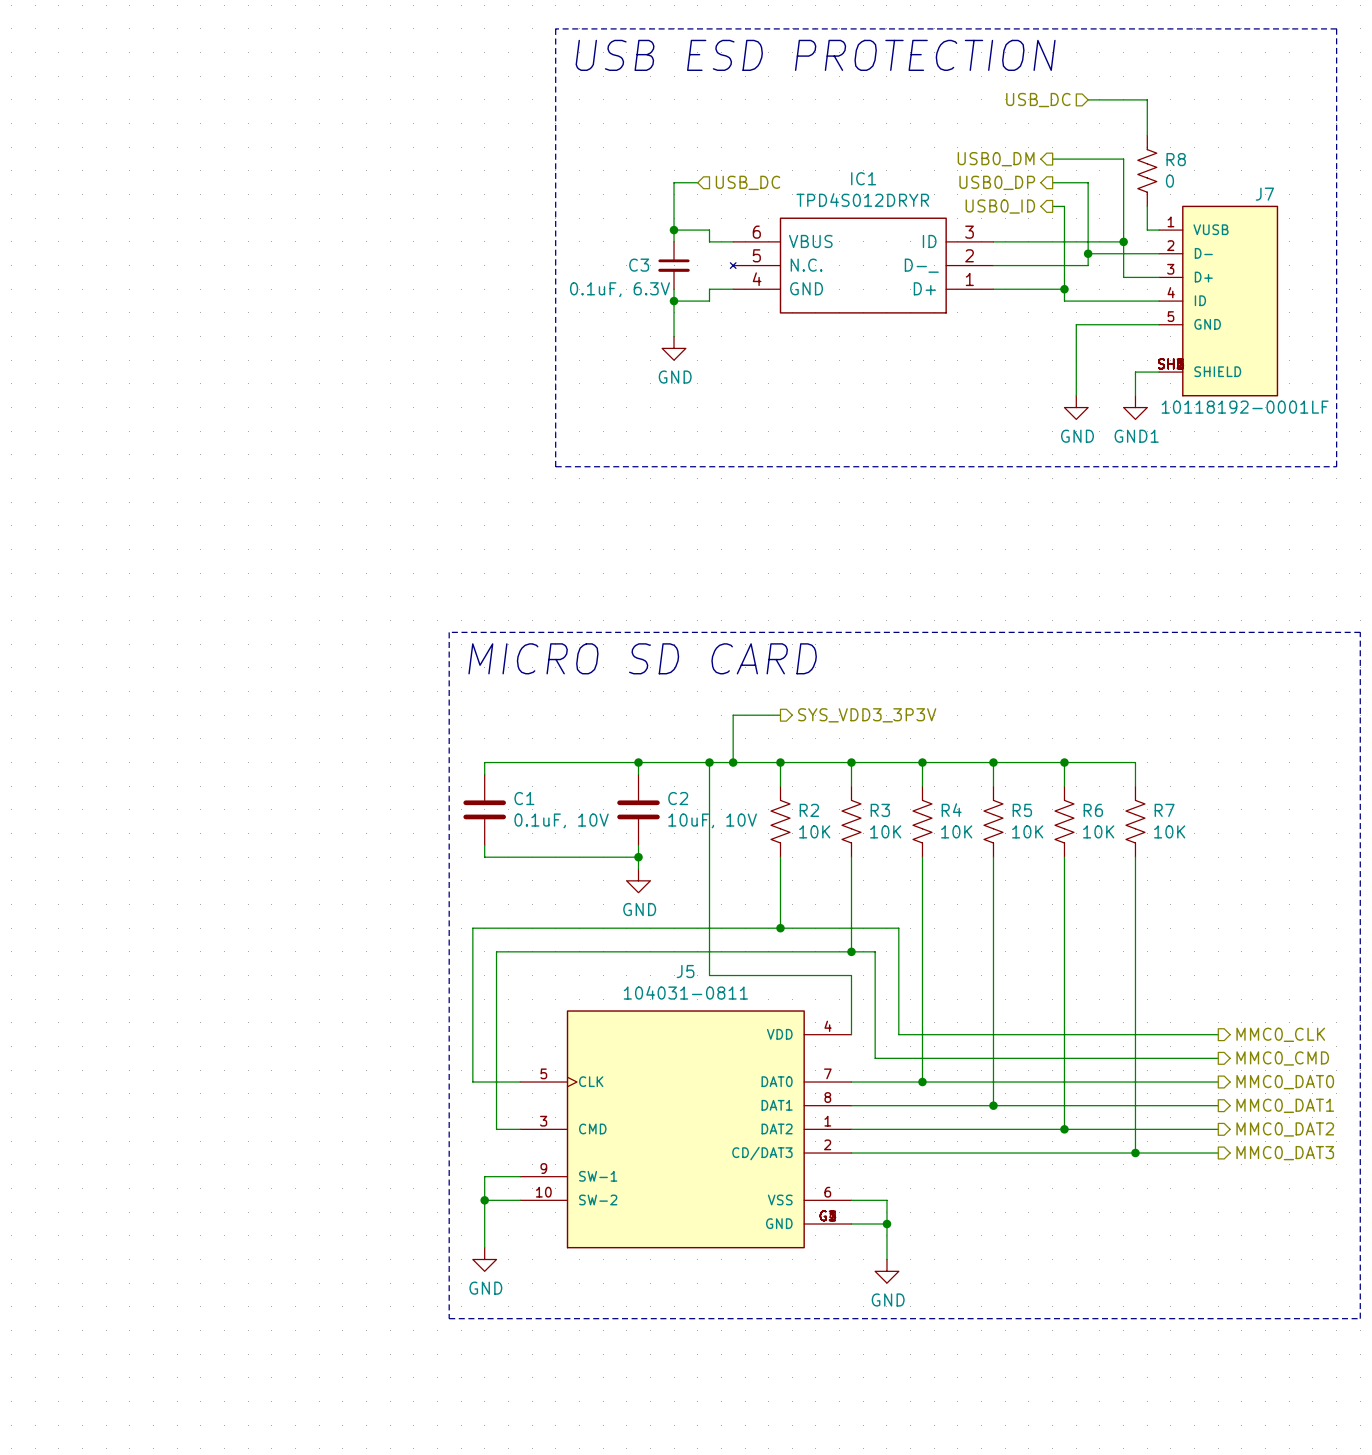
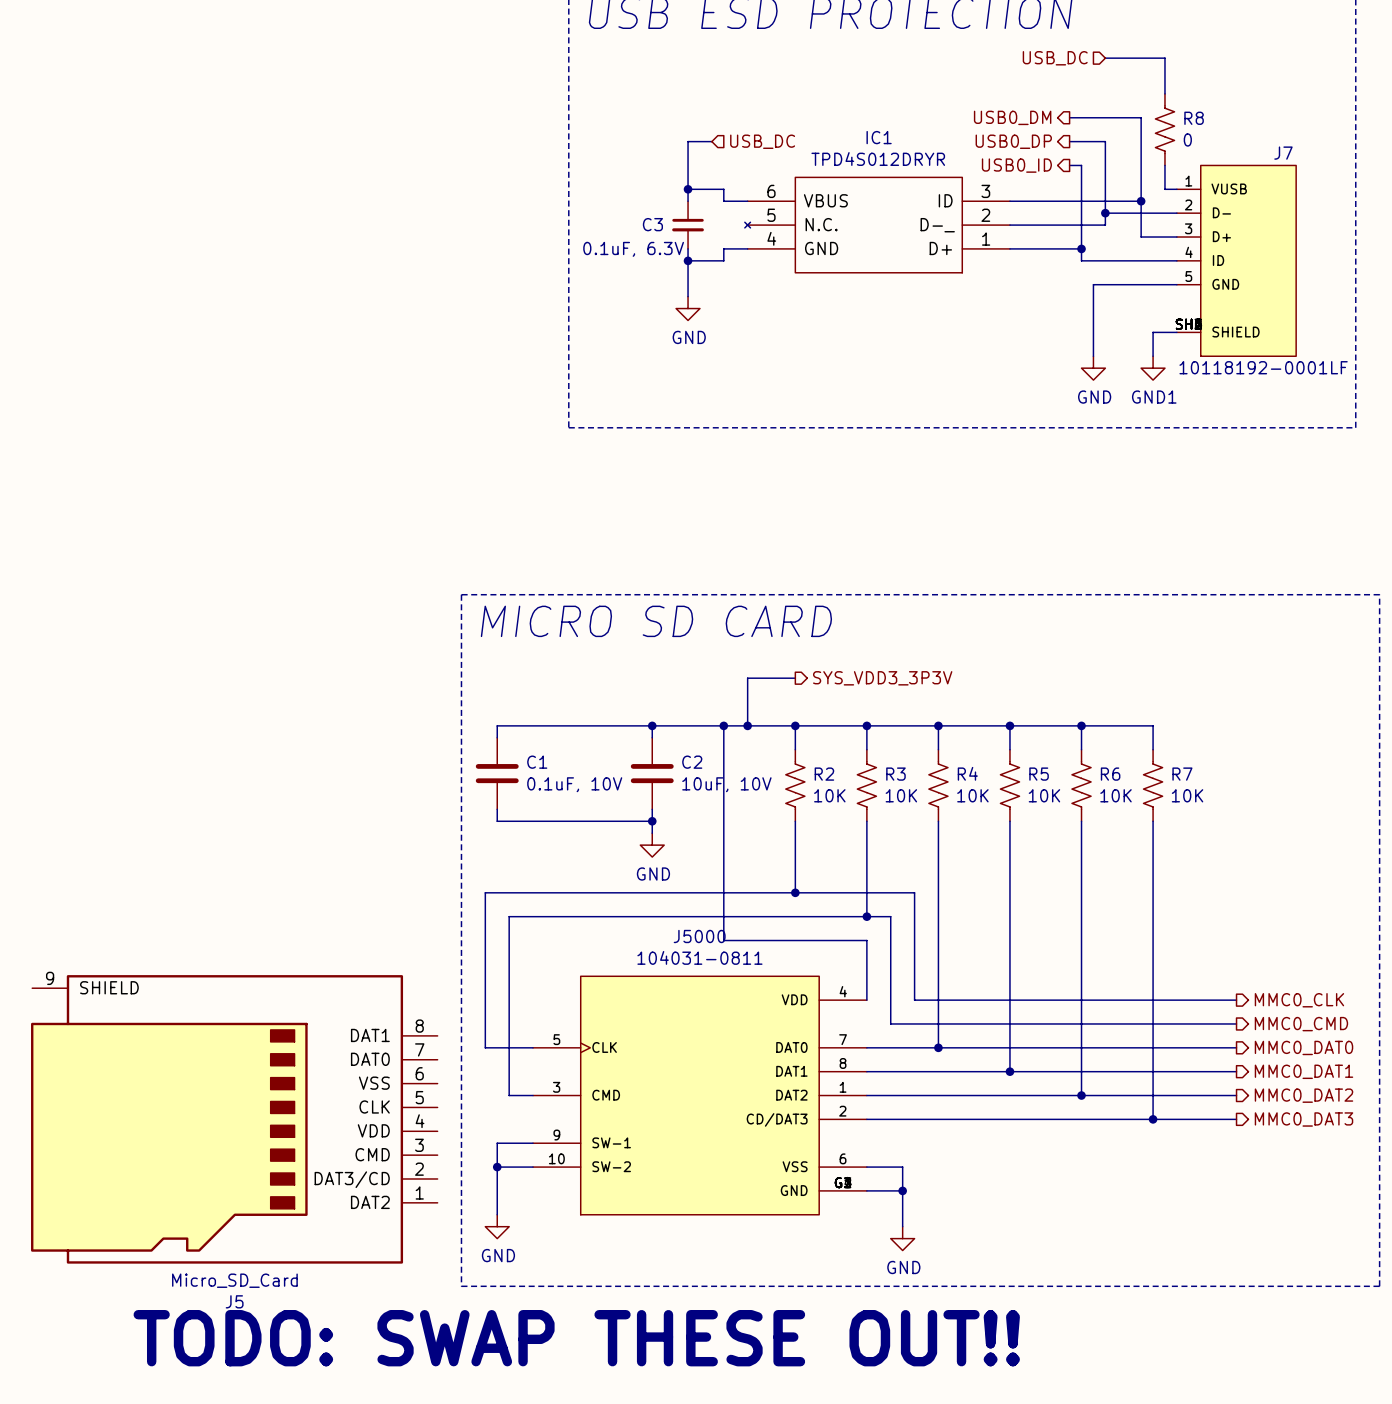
J5 name: J5 (685, 971) -> J5000 (699, 936)
J5: none -> Micro_SD_Card (234, 1119)
text: none -> TODO: SWAP THESE OUT!! (576, 1338)

